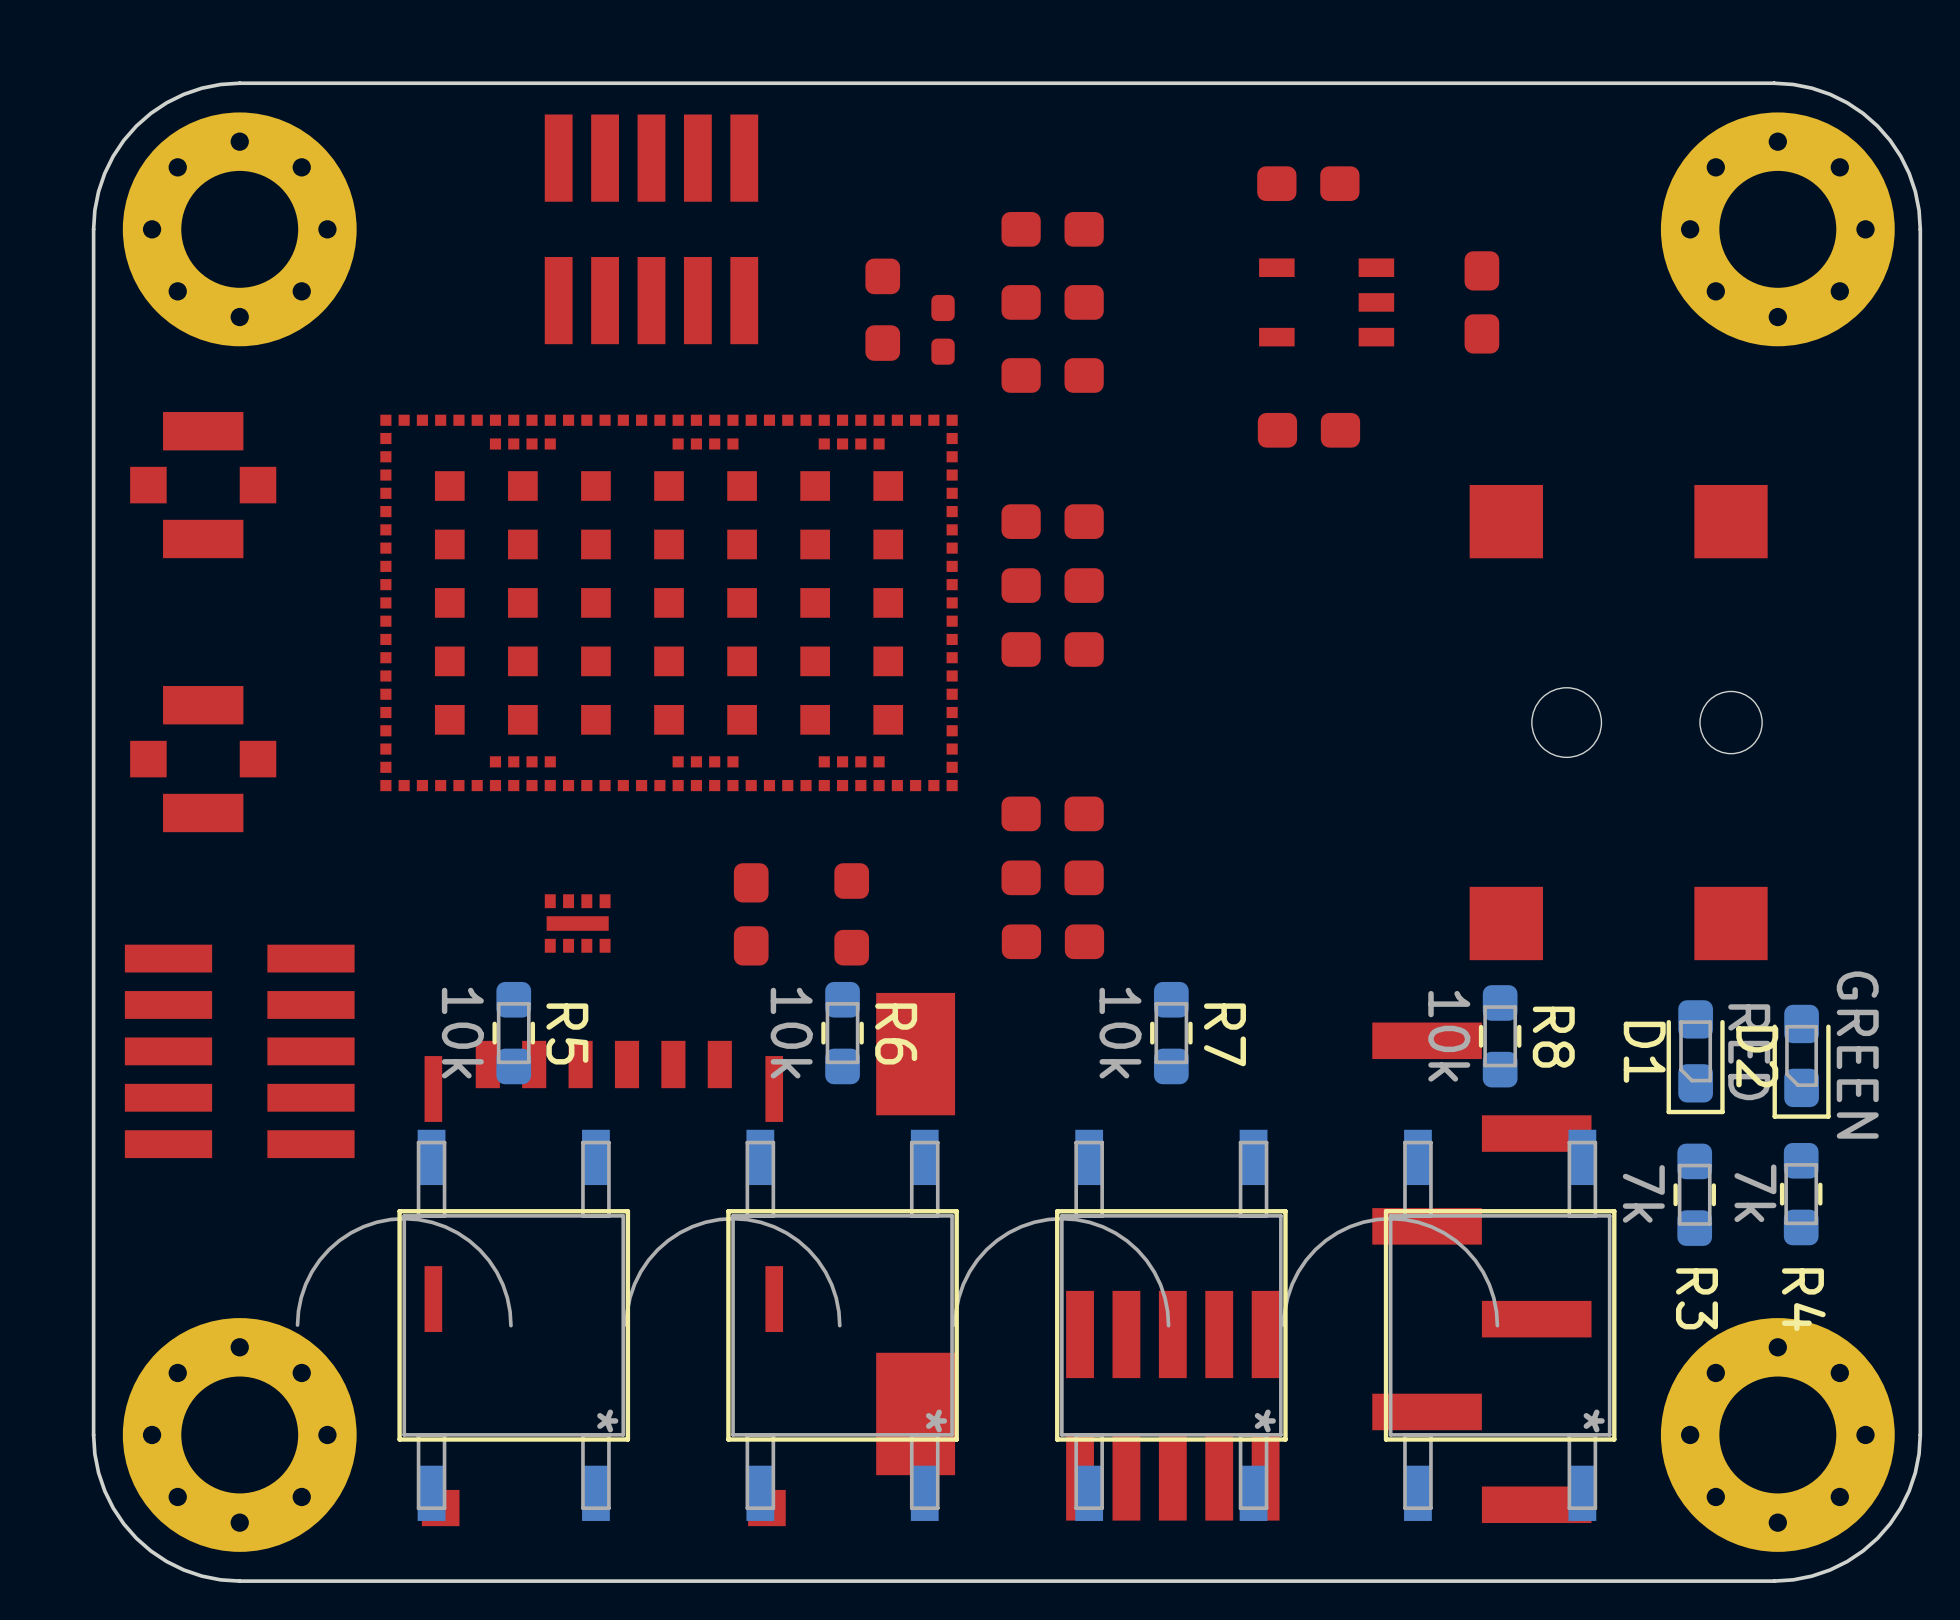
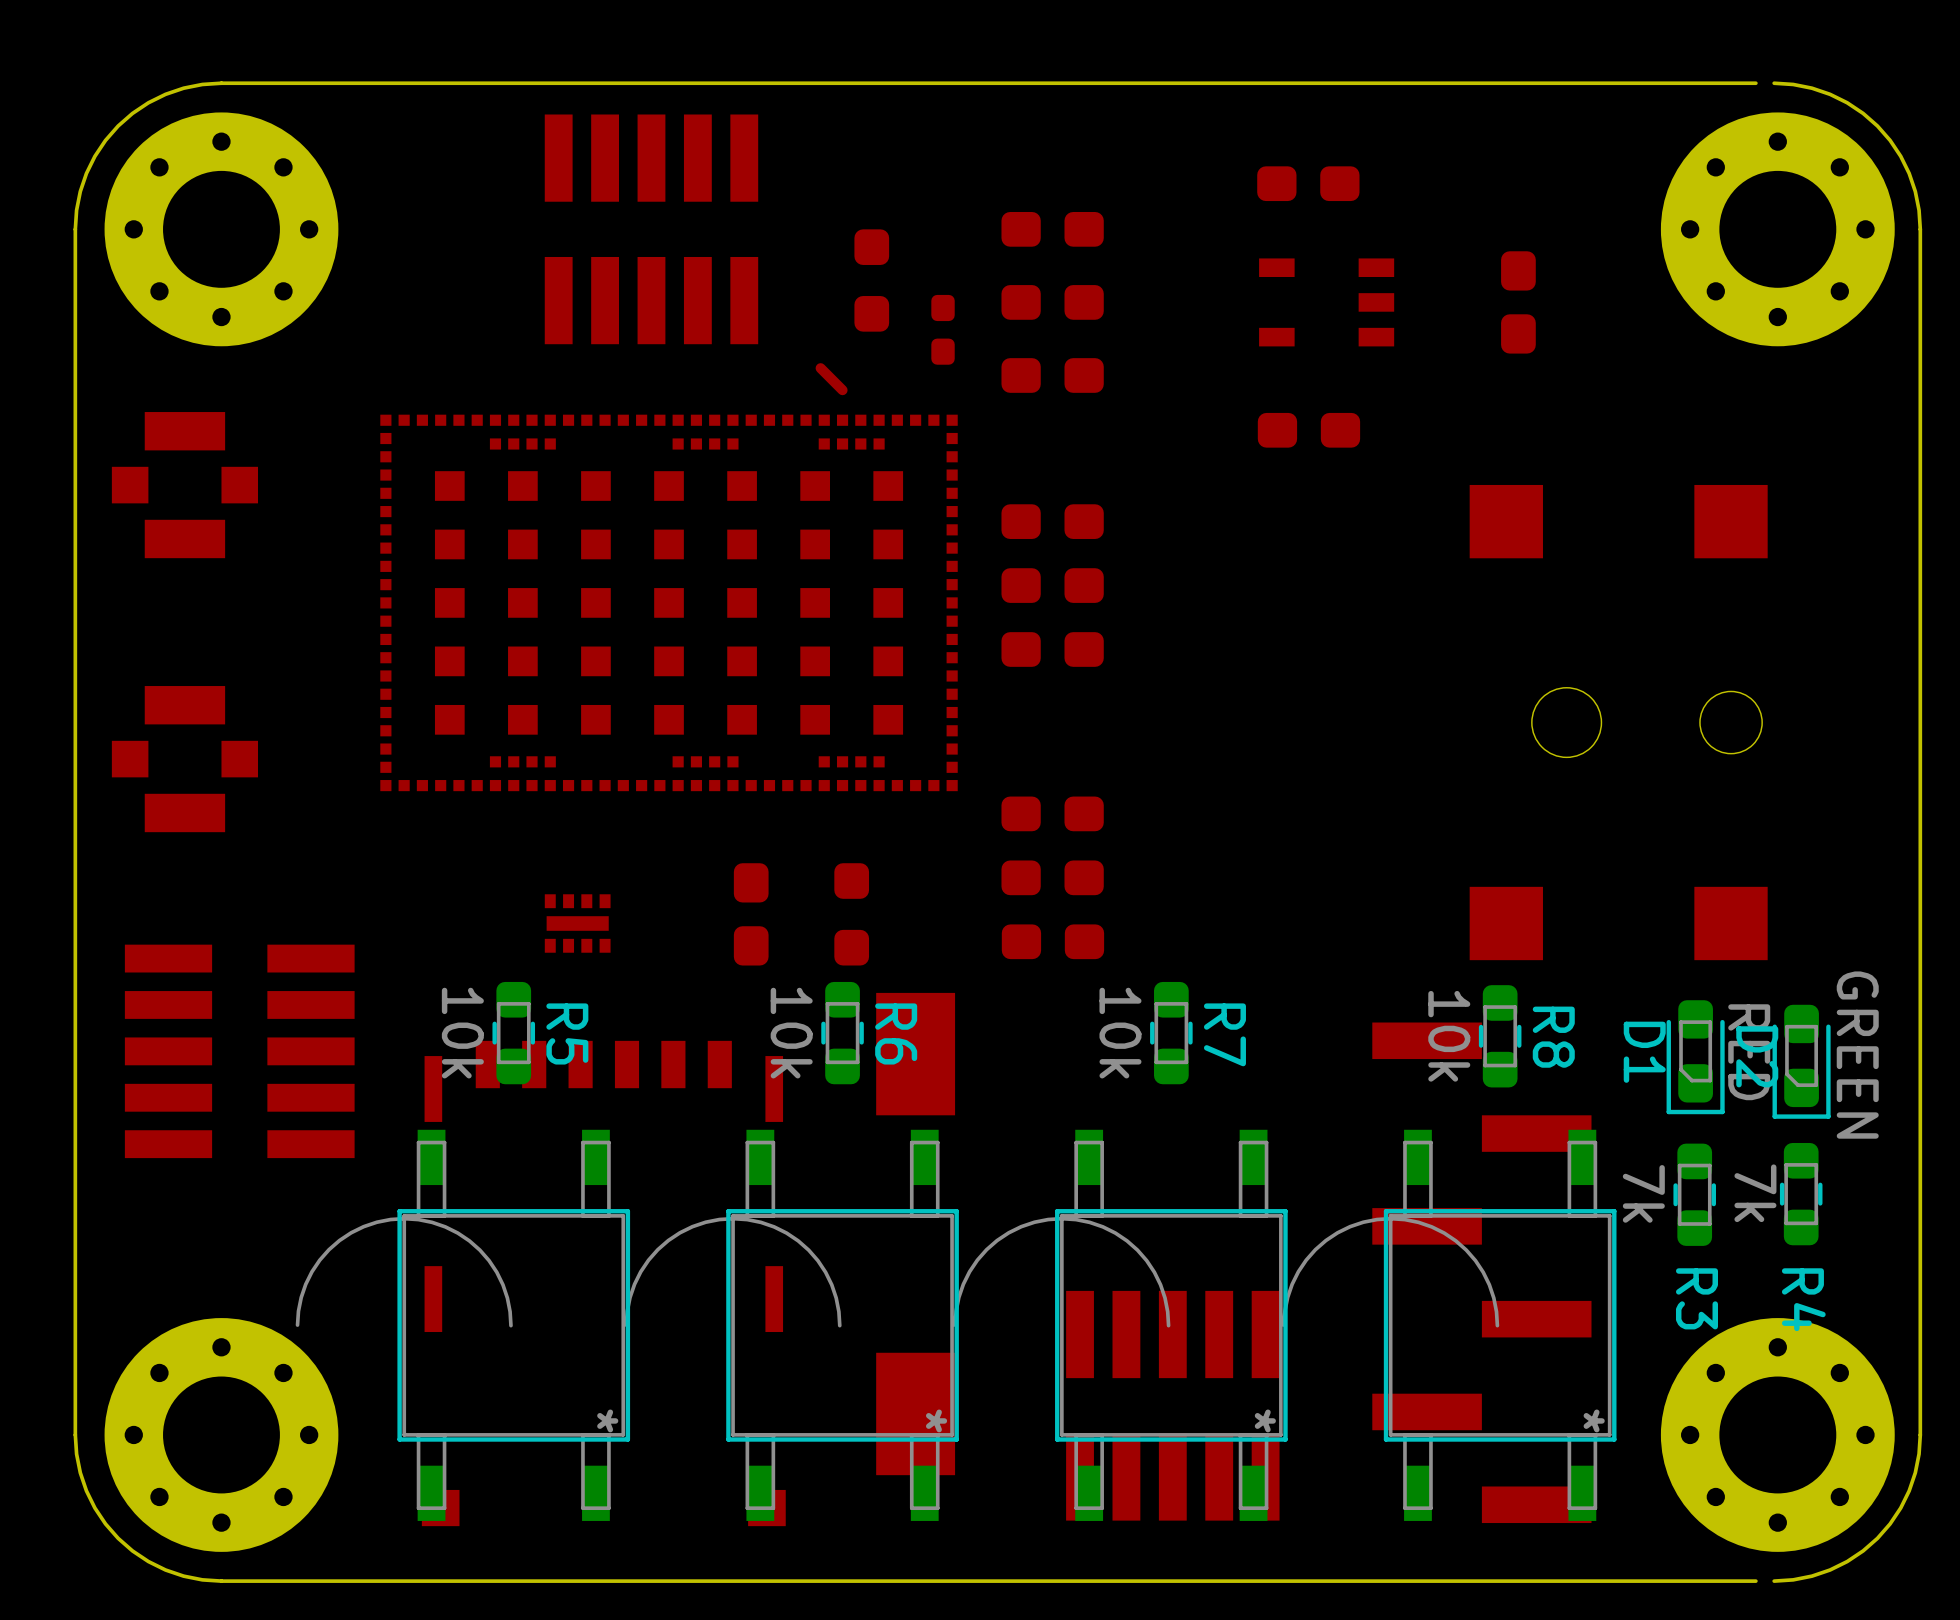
board edge: (239, 83) (201, 88) (183, 94) (150, 113) (136, 126) (123, 140) (104, 173) (98, 191) (93, 229) (94, 1454) (104, 1490) (113, 1508) (136, 1538) (150, 1550) (166, 1561) (201, 1576) (239, 1581) -> (239, 83) (202, 84) (165, 94) (148, 102) (118, 126) (105, 140) (86, 173) (80, 191) (75, 229) (76, 1454) (80, 1472) (94, 1508) (105, 1523) (132, 1550) (148, 1561) (183, 1576) (202, 1579) (239, 1581)
board edge: (1774, 83) (1755, 83) -> none
part position: (239, 229) -> (221, 229)
part position: (1481, 302) -> (1518, 302)
part position: (882, 309) -> (871, 280)
top track: none -> (820, 368) (842, 390)
part position: (203, 485) -> (184, 485)
part position: (203, 759) -> (184, 759)
part position: (239, 1434) -> (221, 1434)
board edge: (1774, 1581) (1755, 1581) -> none

